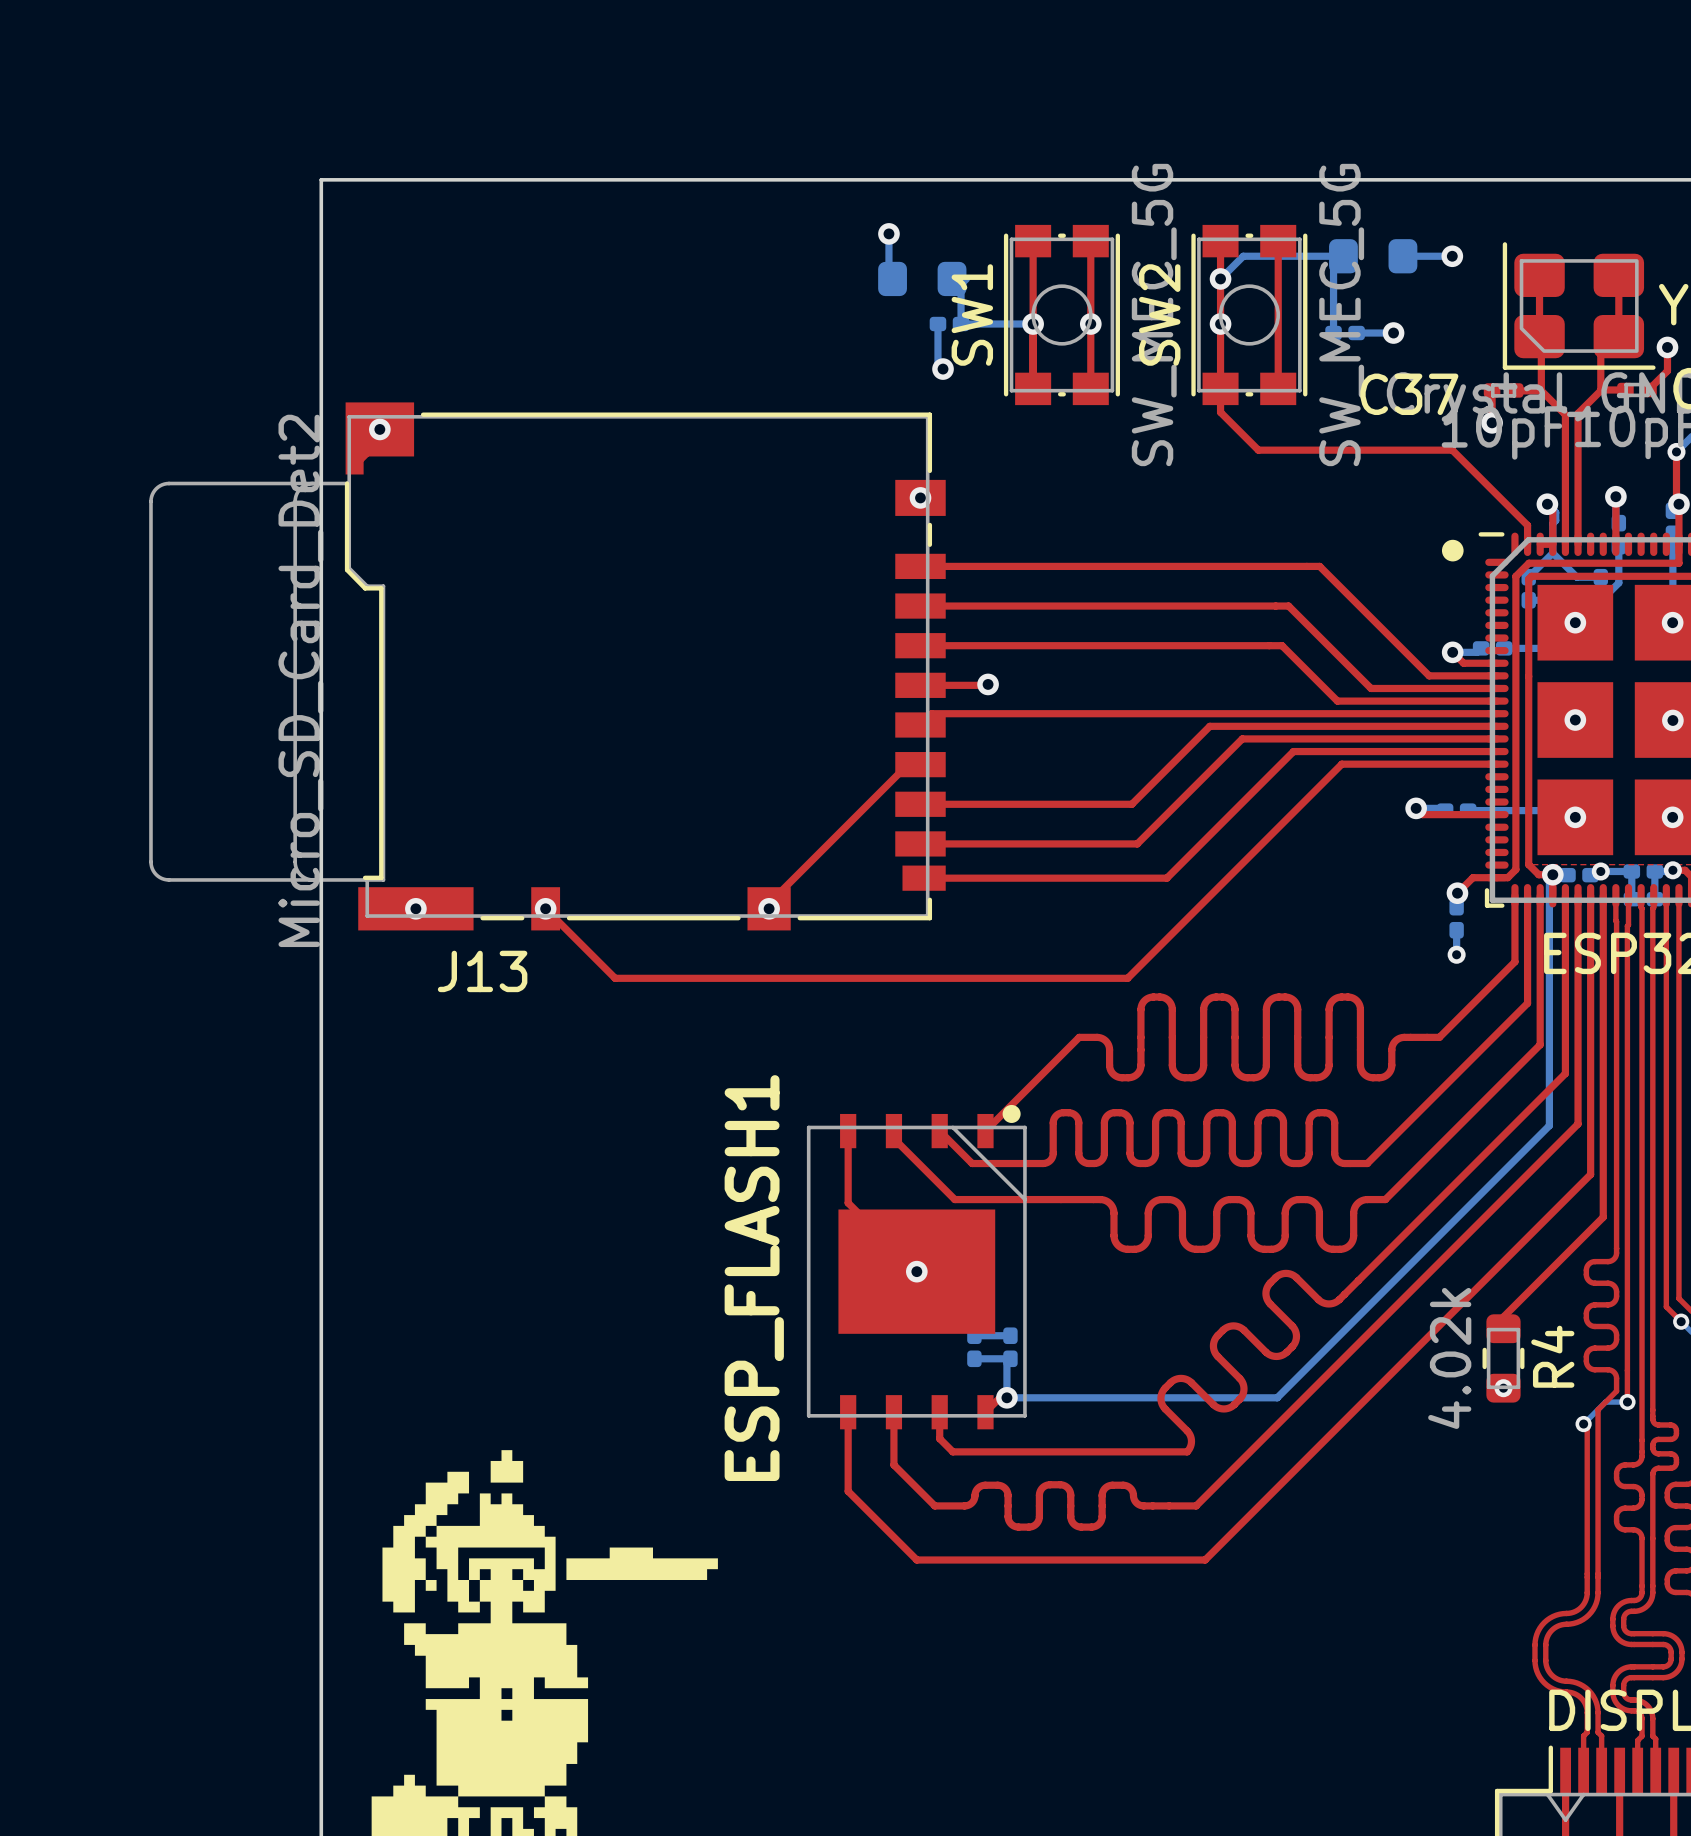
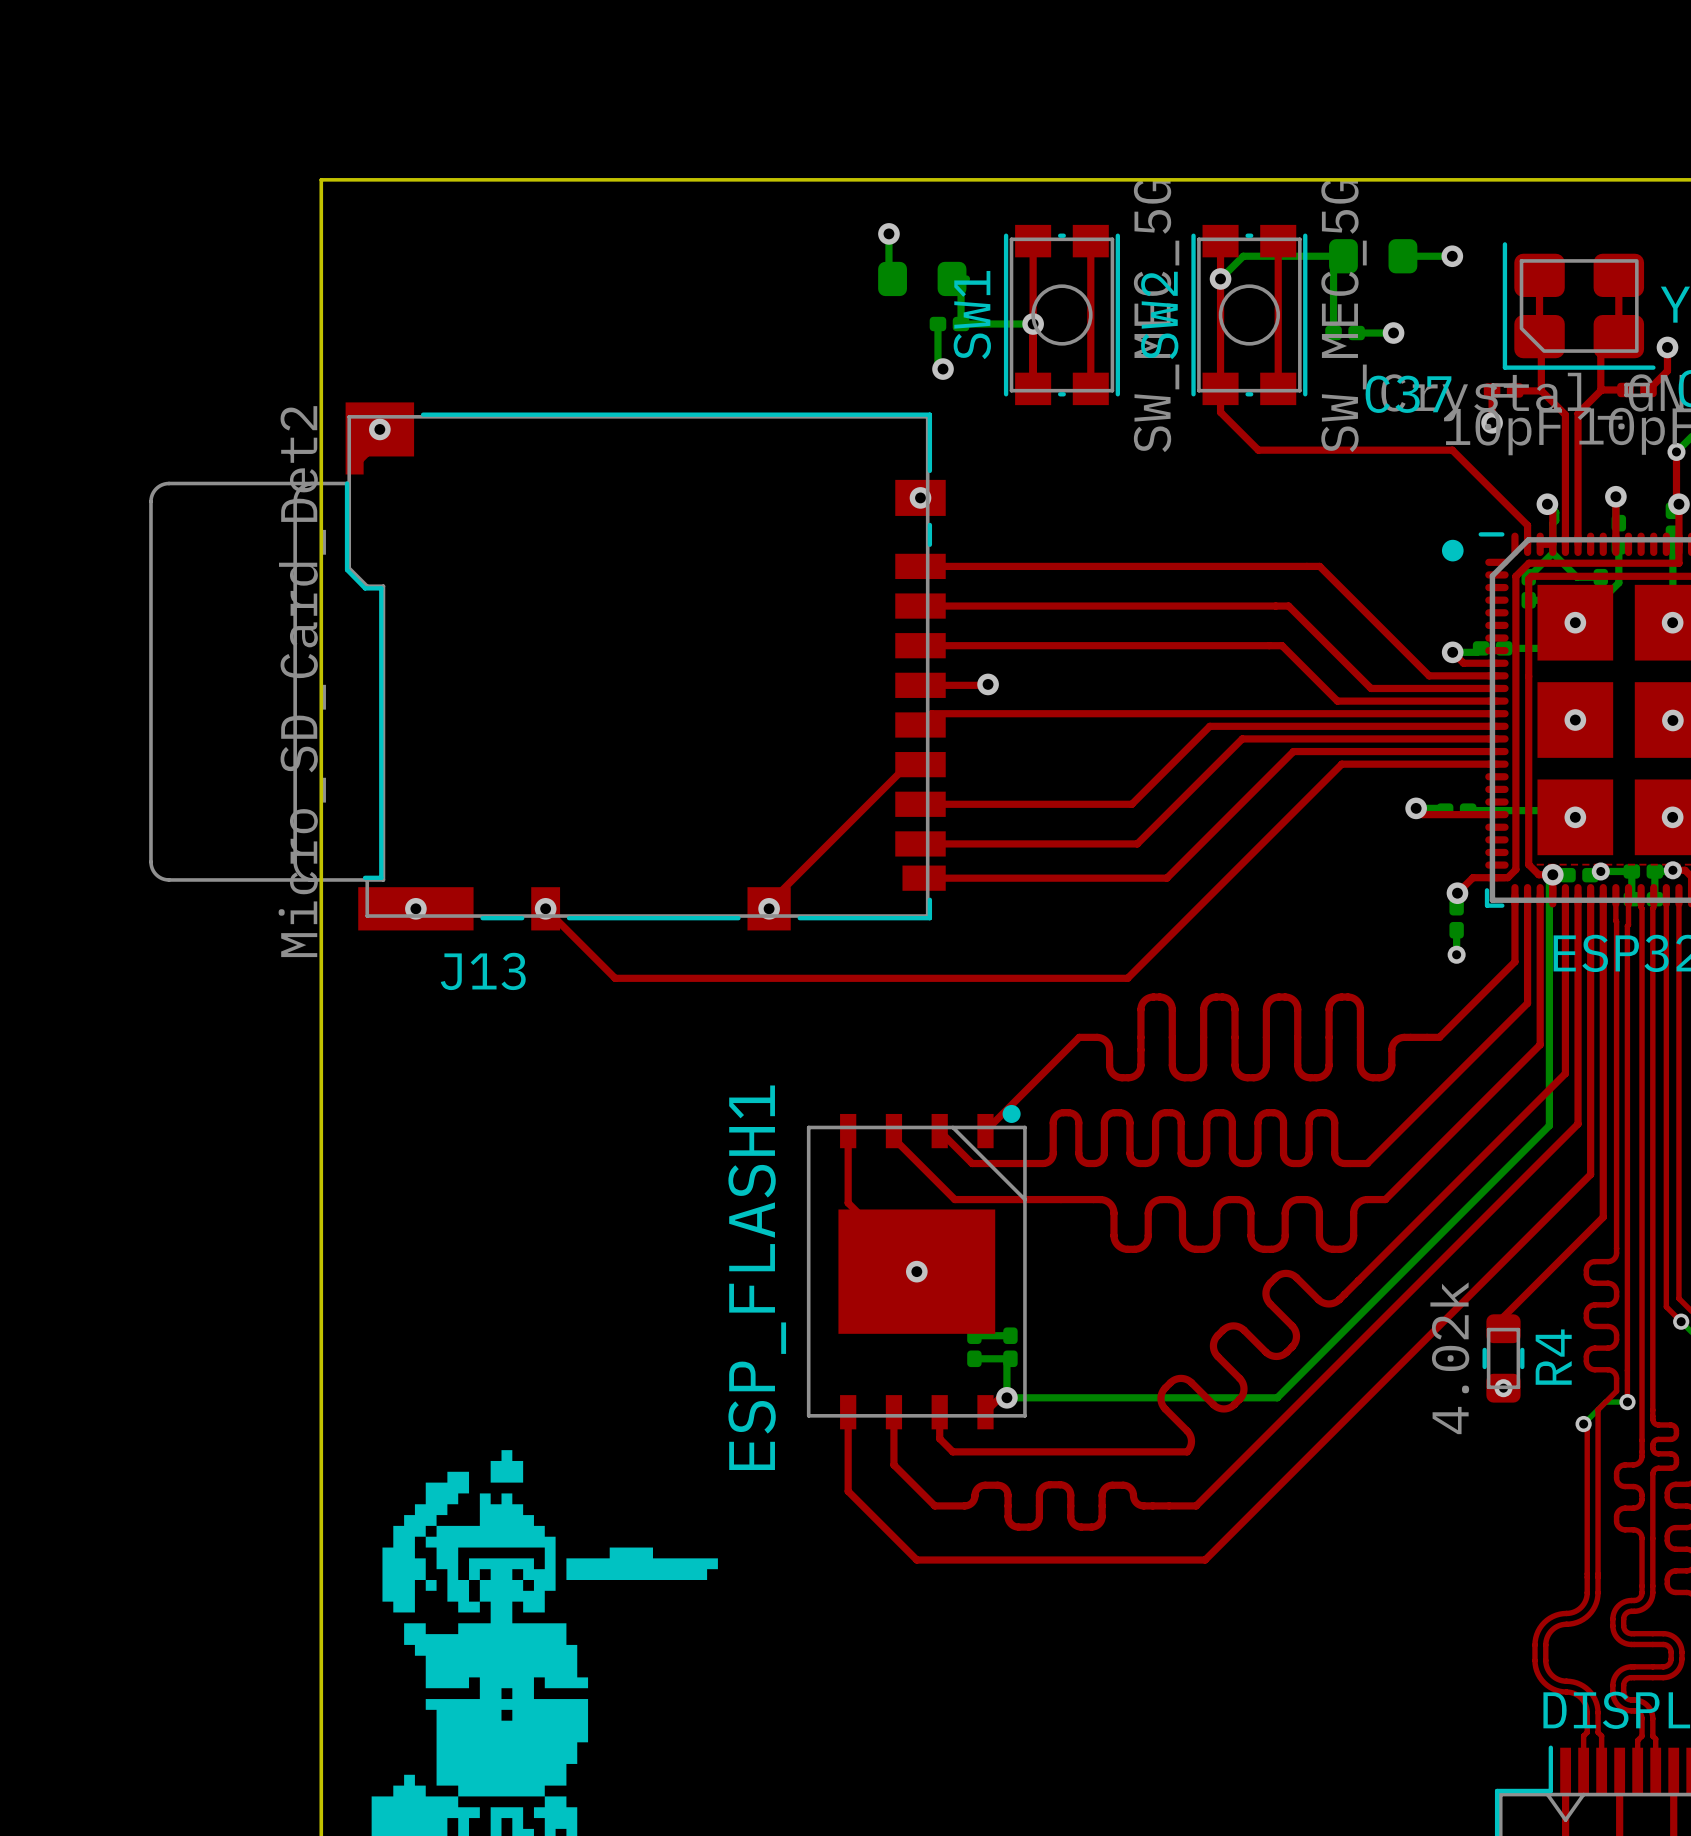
via: (1090, 324) -> none
via: (1220, 324) -> none

